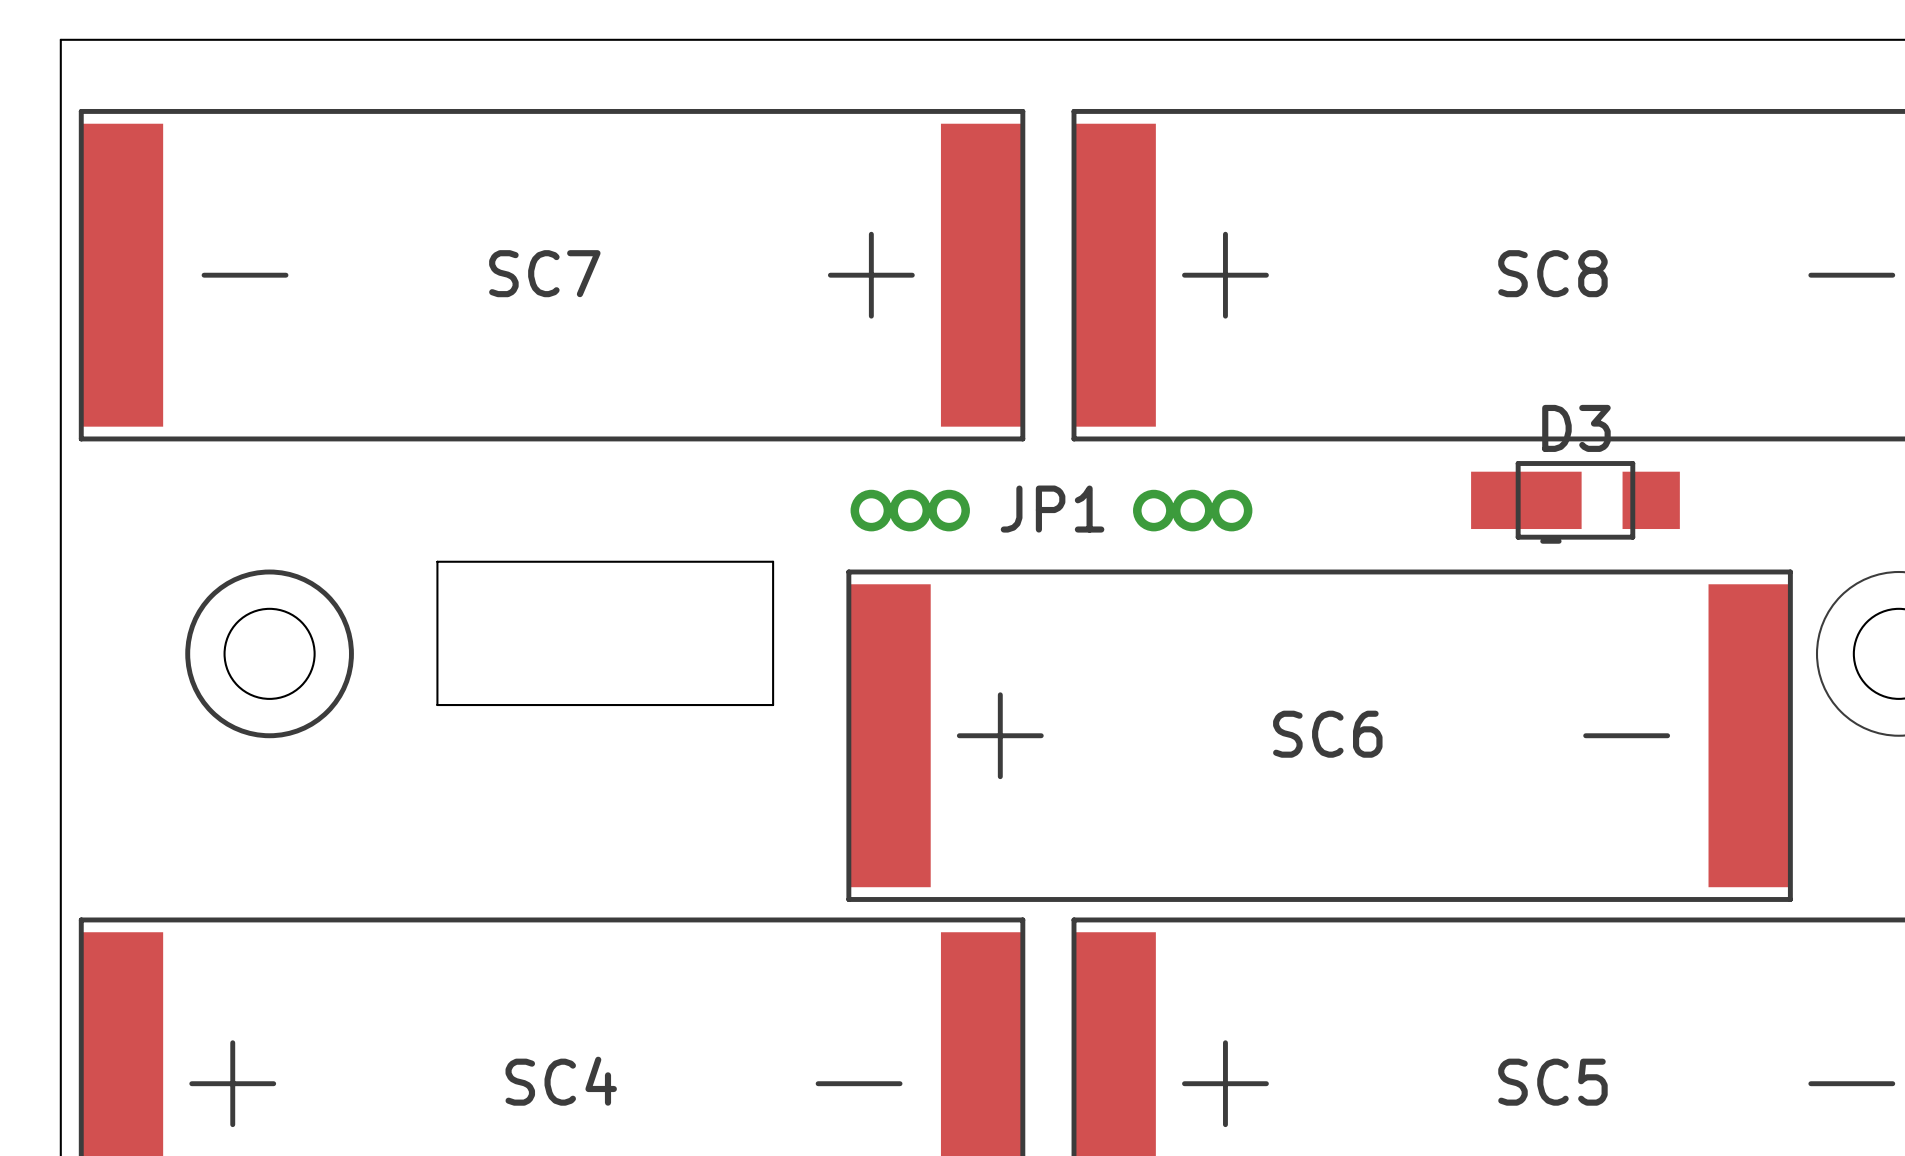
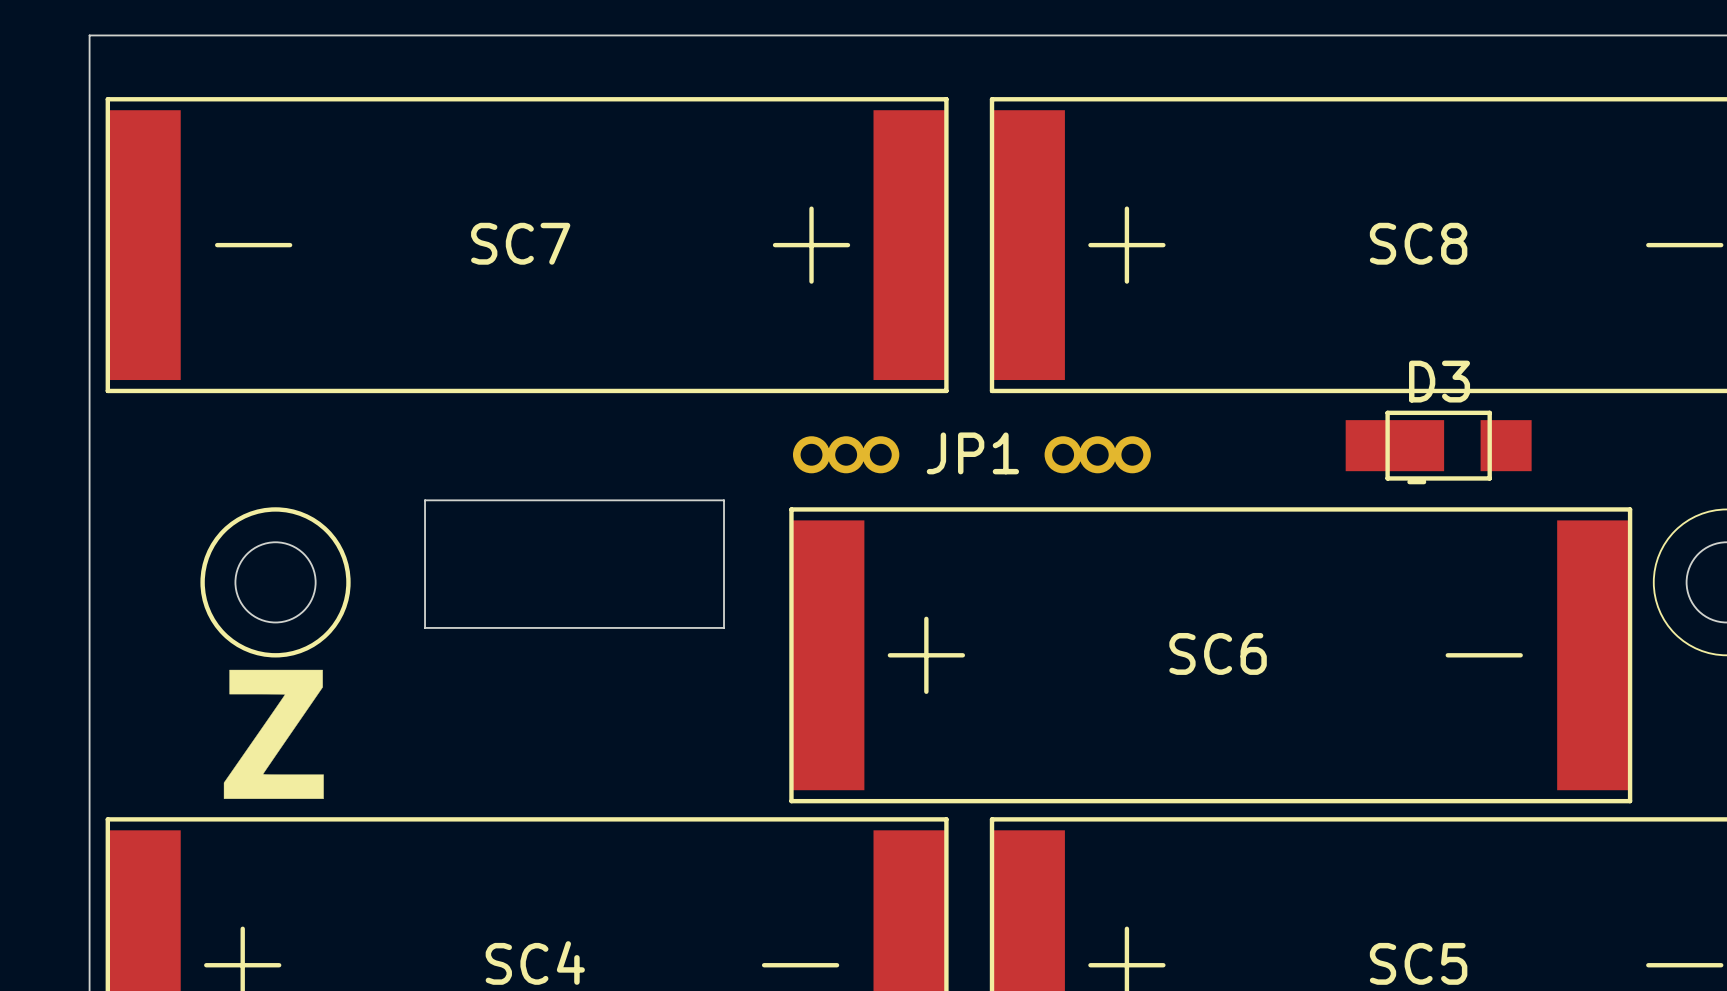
drawing: none -> [223, 669, 324, 799]

